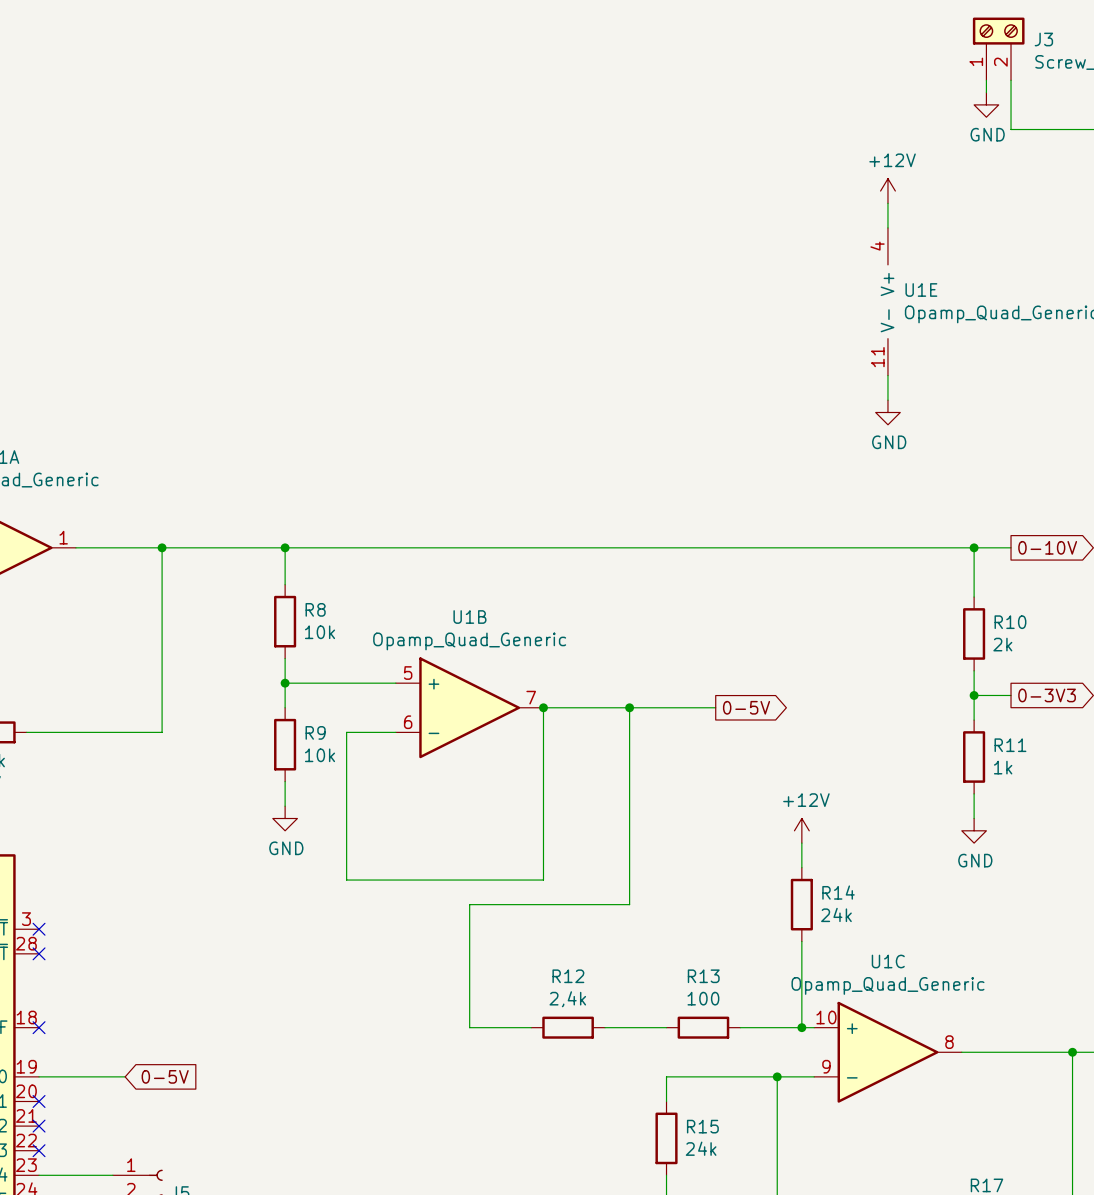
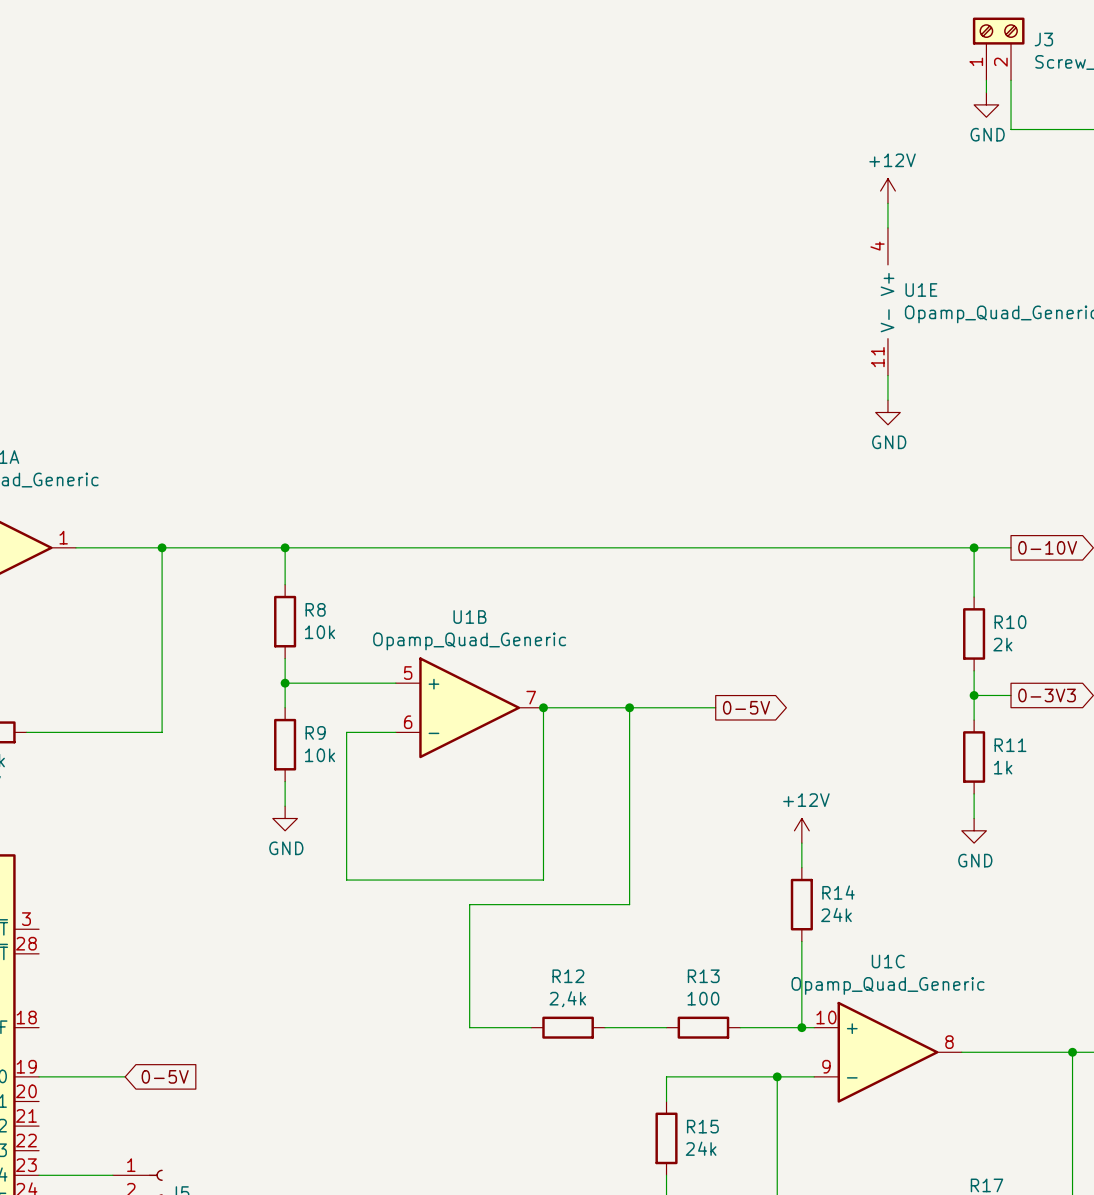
no-connect mark: (39, 929) -> none
no-connect mark: (39, 953) -> none
no-connect mark: (39, 1027) -> none
no-connect mark: (39, 1101) -> none
no-connect mark: (39, 1126) -> none
no-connect mark: (39, 1150) -> none

